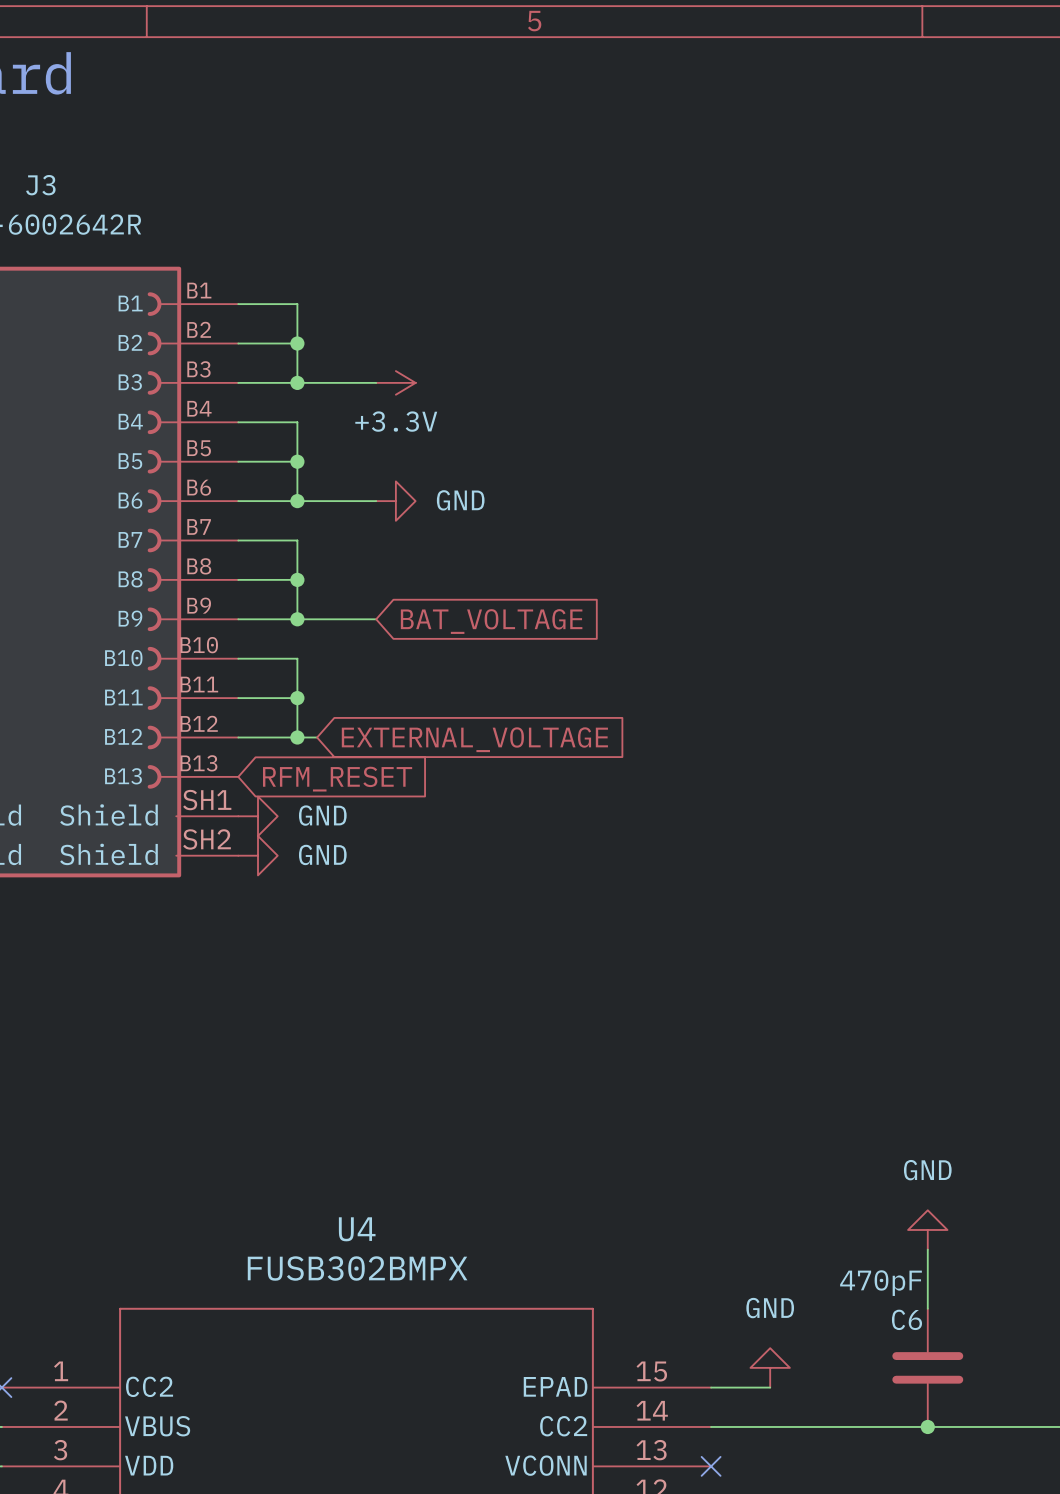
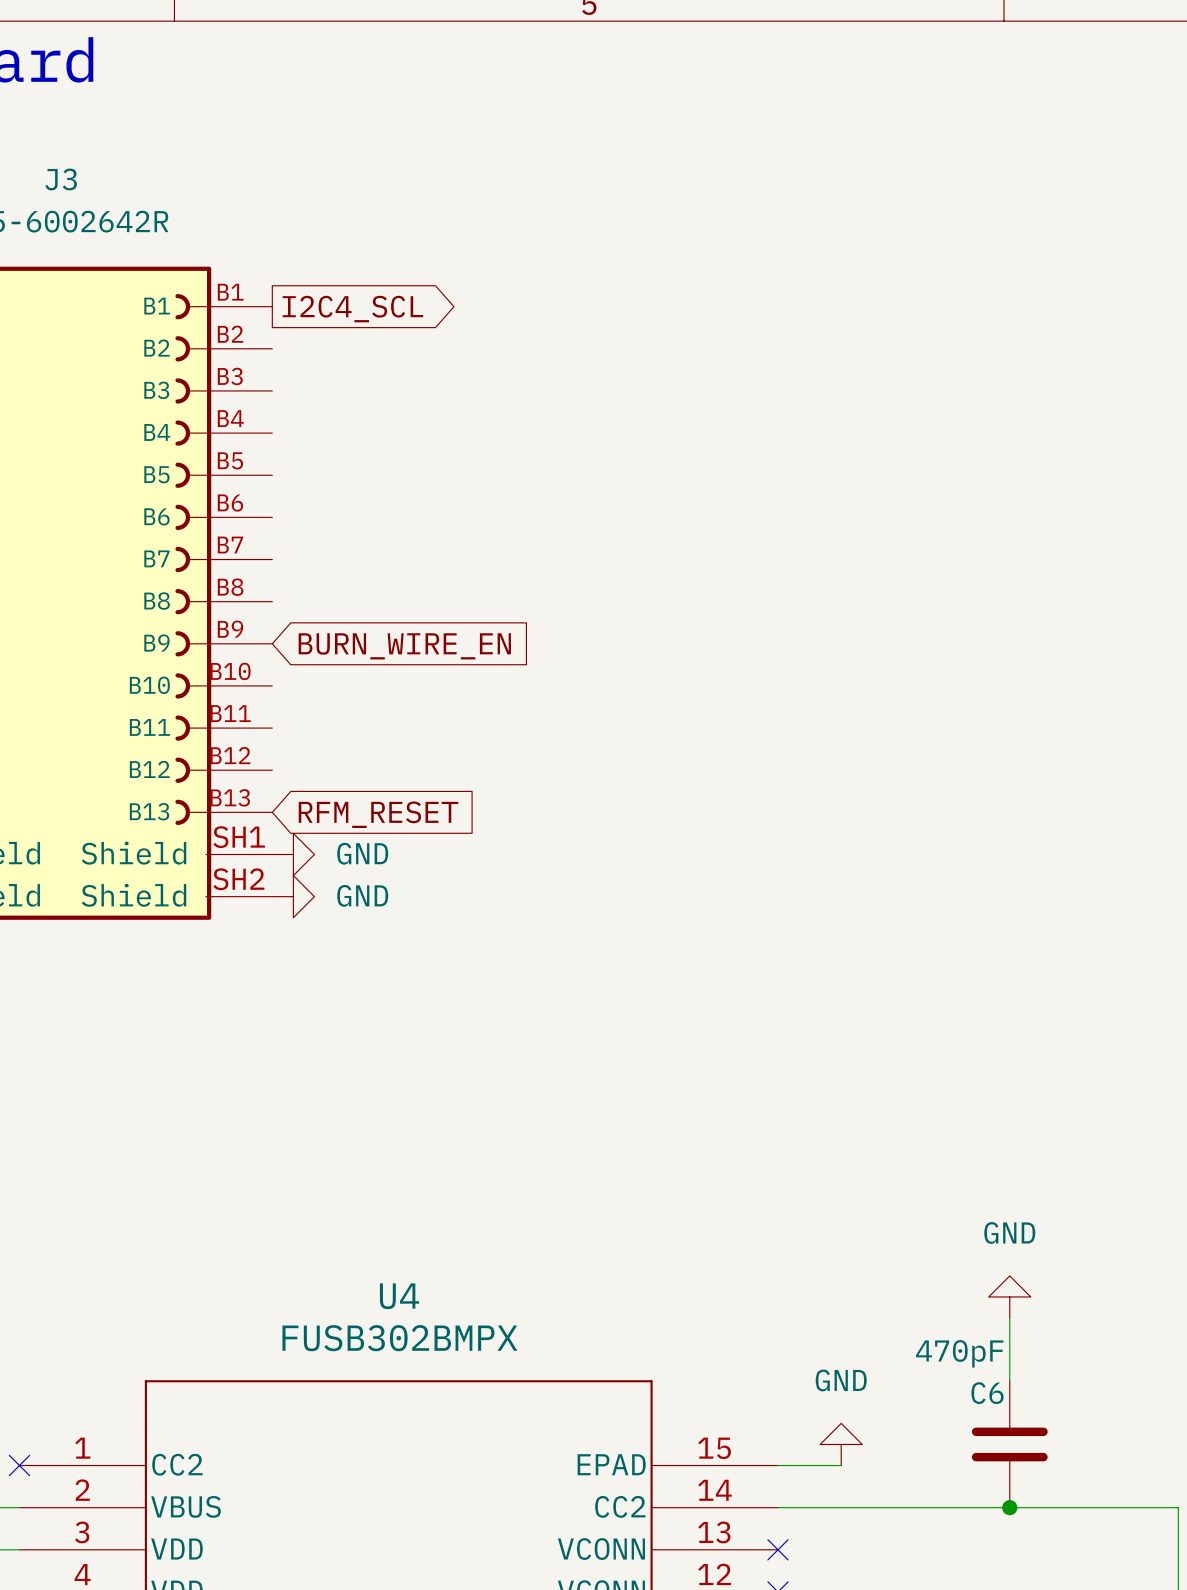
wire: (238, 304) (297, 304) (297, 382) -> none
global label: none -> I2C4_SCL (352, 309)
wire: (238, 343) (297, 343) -> none
junction: (297, 343) -> none
wire: (238, 382) (376, 382) -> none
junction: (297, 382) -> none
power symbol: +3.3V (395, 382) -> none
wire: (238, 422) (297, 422) (297, 501) -> none
wire: (238, 461) (297, 461) -> none
junction: (297, 461) -> none
wire: (238, 501) (376, 501) -> none
junction: (297, 501) -> none
power symbol: GND (395, 501) -> none
wire: (238, 540) (297, 540) (297, 619) -> none
wire: (238, 579) (297, 579) -> none
junction: (297, 579) -> none
wire: (238, 619) (376, 619) -> none
junction: (297, 619) -> none
global label: none -> BURN_WIRE_EN (404, 646)
global label: BAT_VOLTAGE (491, 621) -> none
wire: (238, 658) (297, 658) (297, 737) -> none
wire: (238, 698) (297, 698) -> none
junction: (297, 698) -> none
wire: (238, 737) (317, 737) -> none
junction: (297, 737) -> none
global label: EXTERNAL_VOLTAGE (474, 739) -> none

